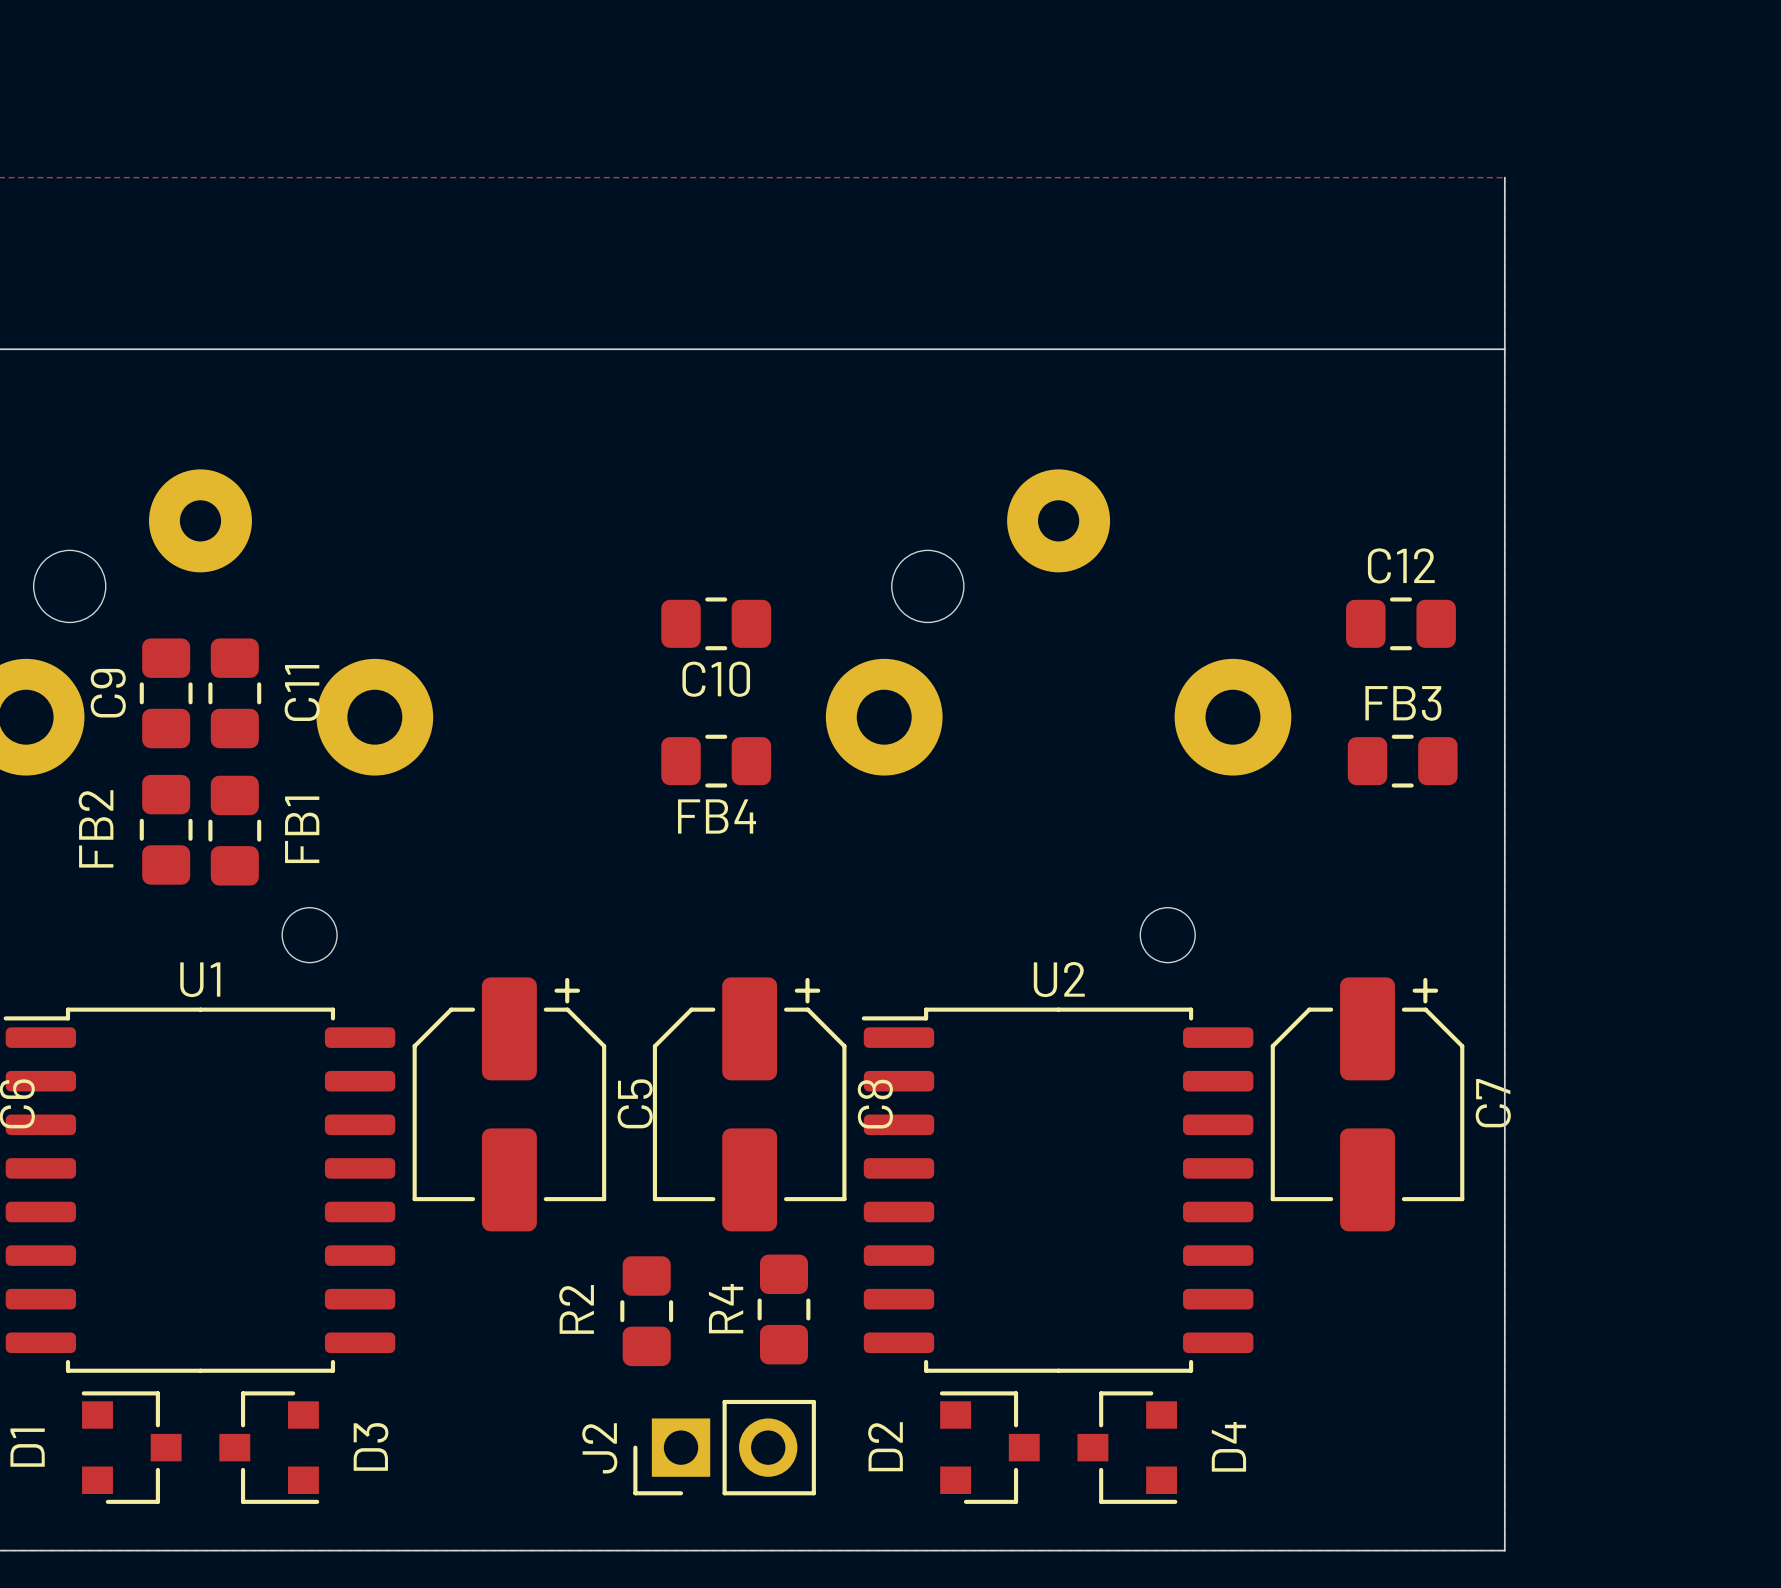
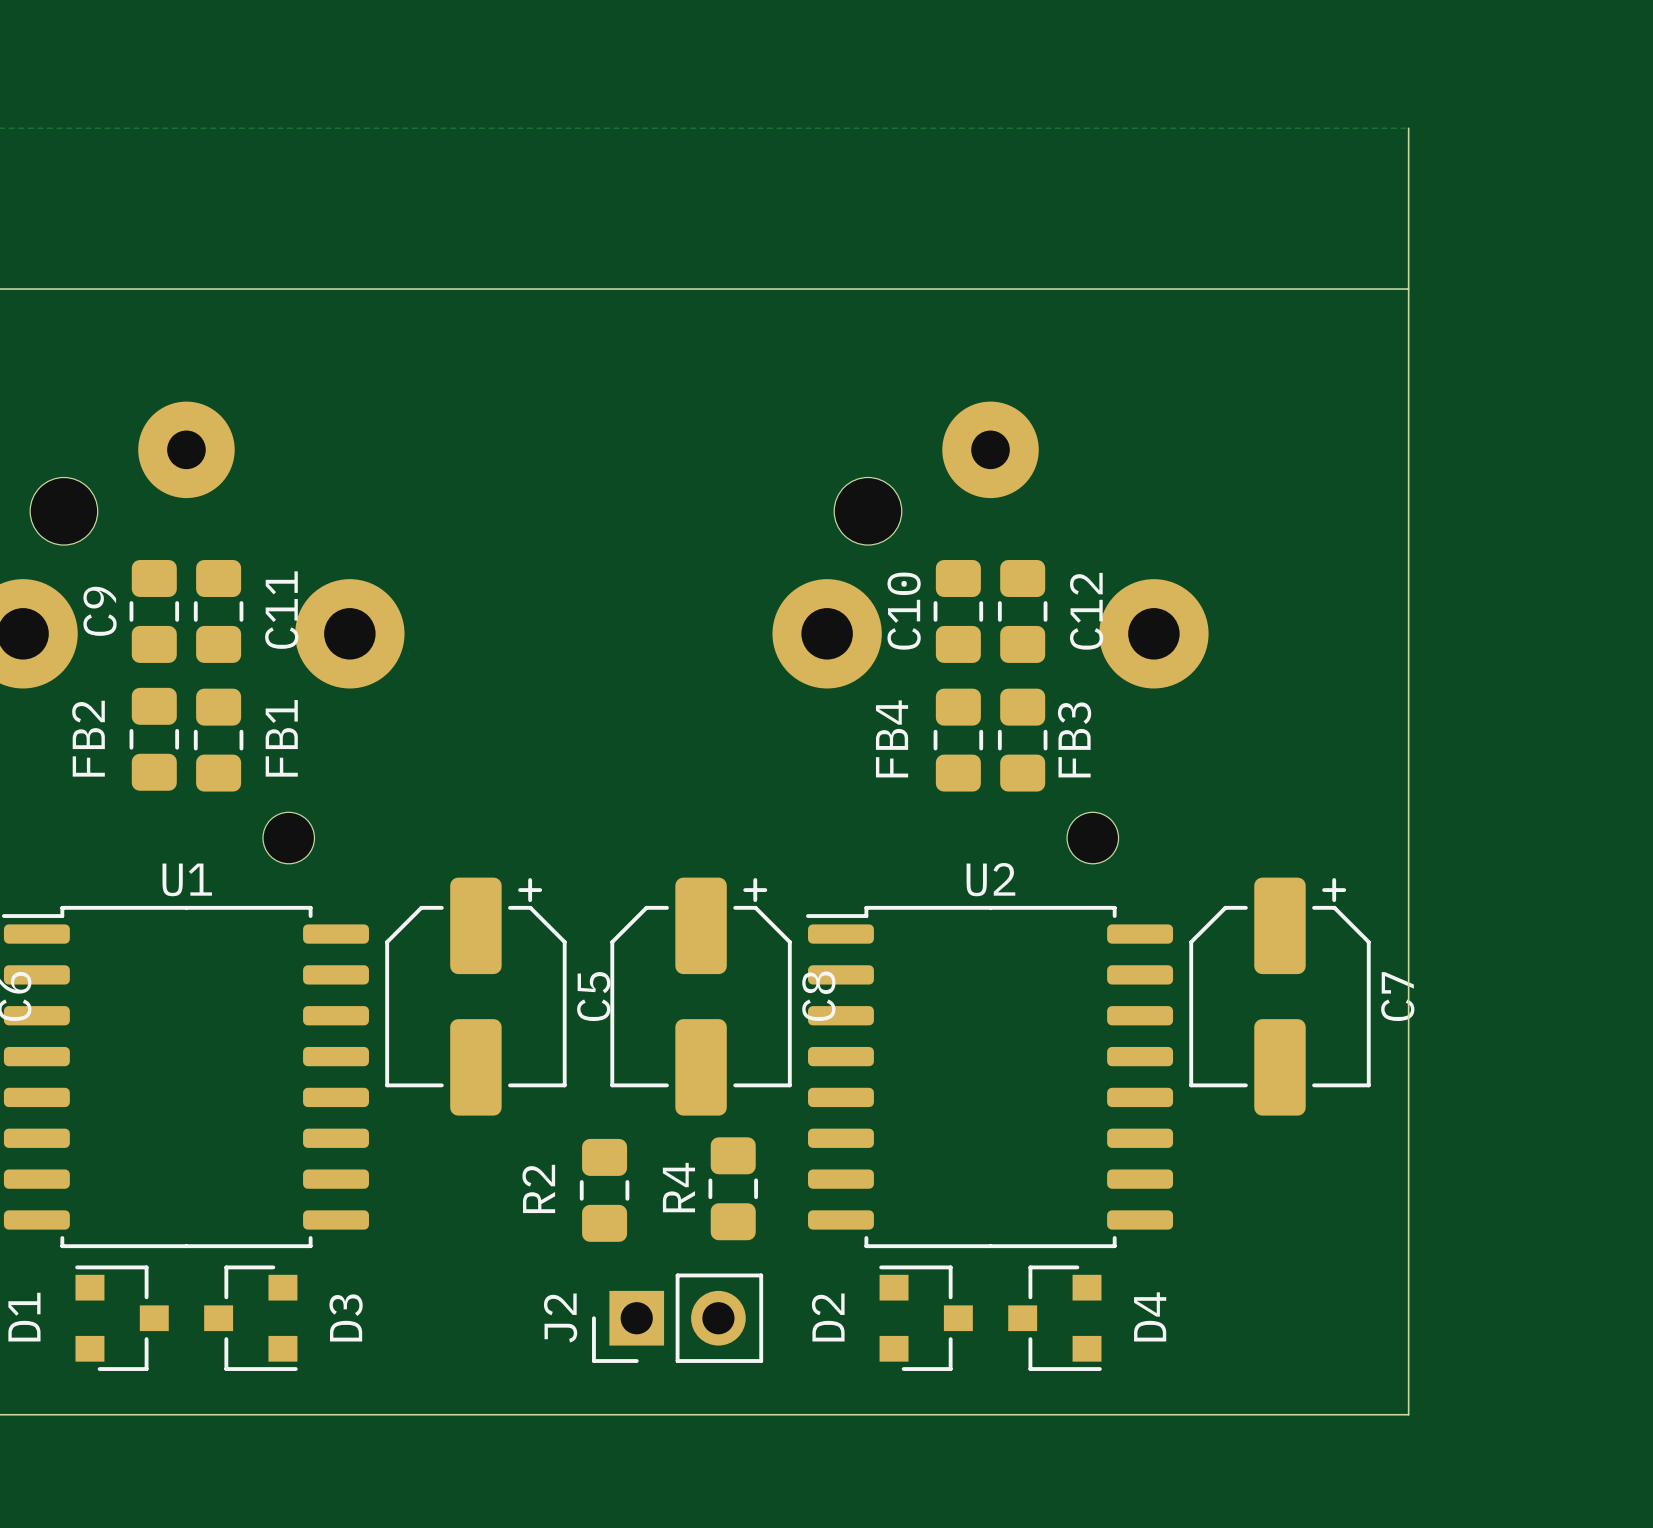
C10 rotation: 0° (716, 623) -> 90° clockwise (958, 611)
C10 position: (716, 623) -> (958, 611)
C12 rotation: 0° (1400, 623) -> 90° clockwise (1022, 611)
C12 position: (1400, 623) -> (1022, 611)
FB4 rotation: 0° (716, 761) -> 90° clockwise (958, 740)
FB4 position: (716, 761) -> (958, 740)
FB3 rotation: 0° (1402, 761) -> 90° clockwise (1022, 740)
FB3 position: (1402, 761) -> (1022, 740)

